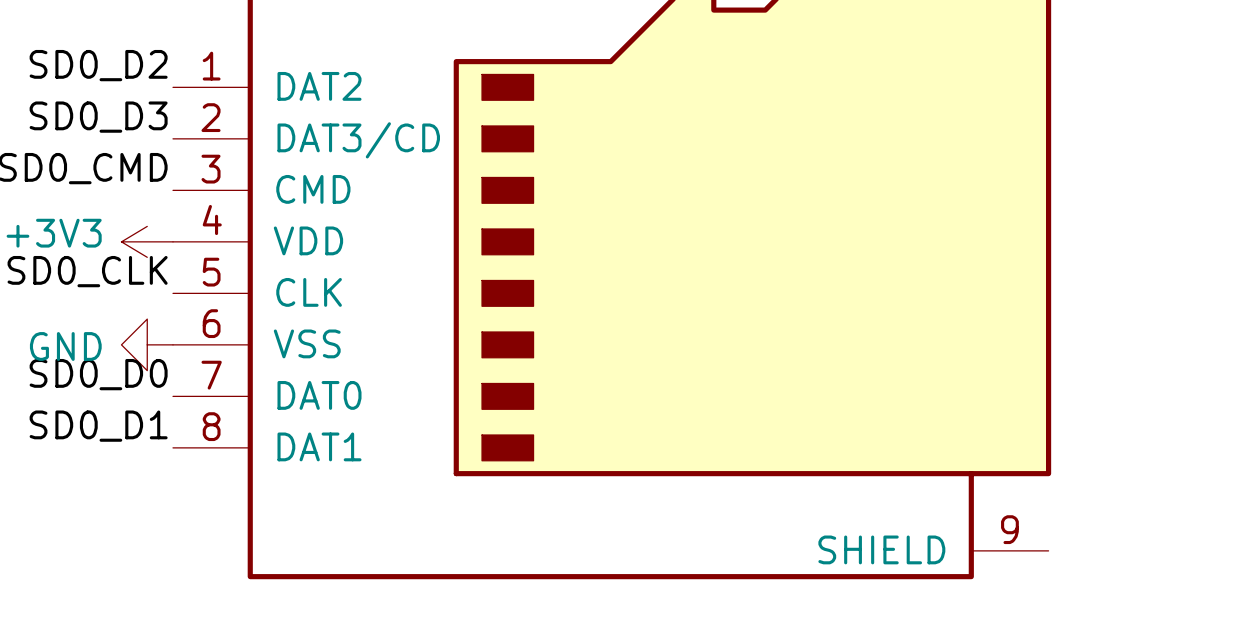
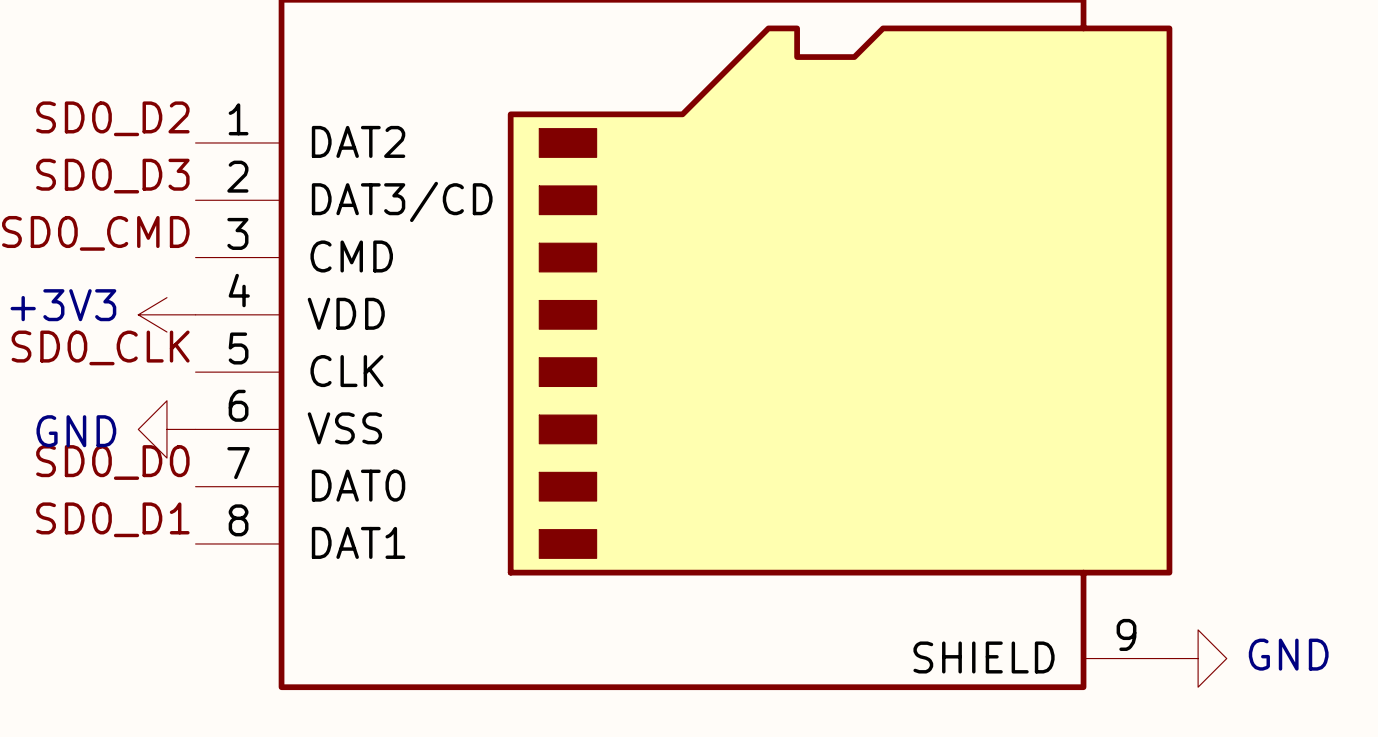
power symbol: none -> GND (1198, 658)

